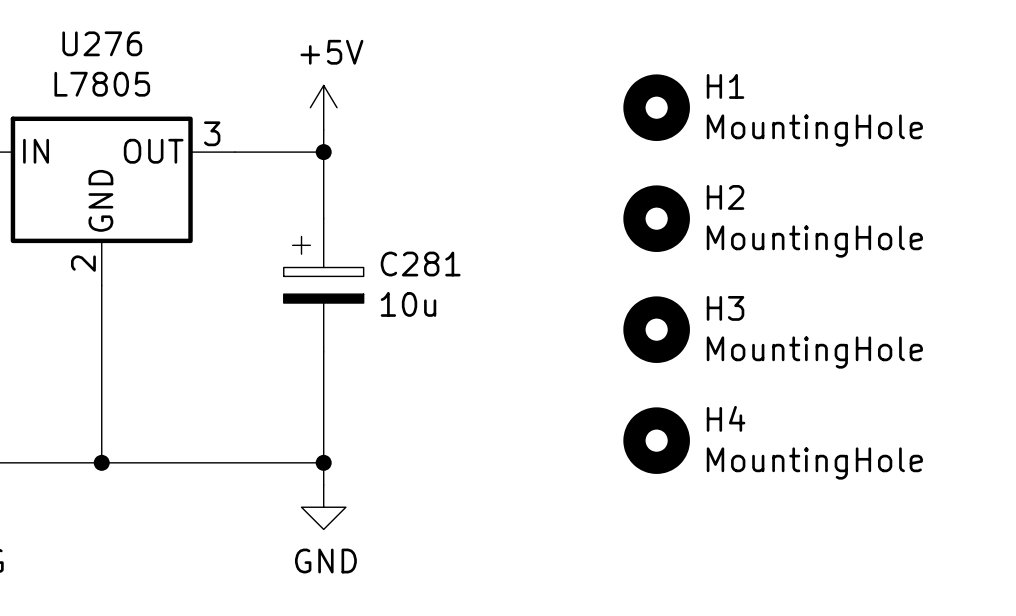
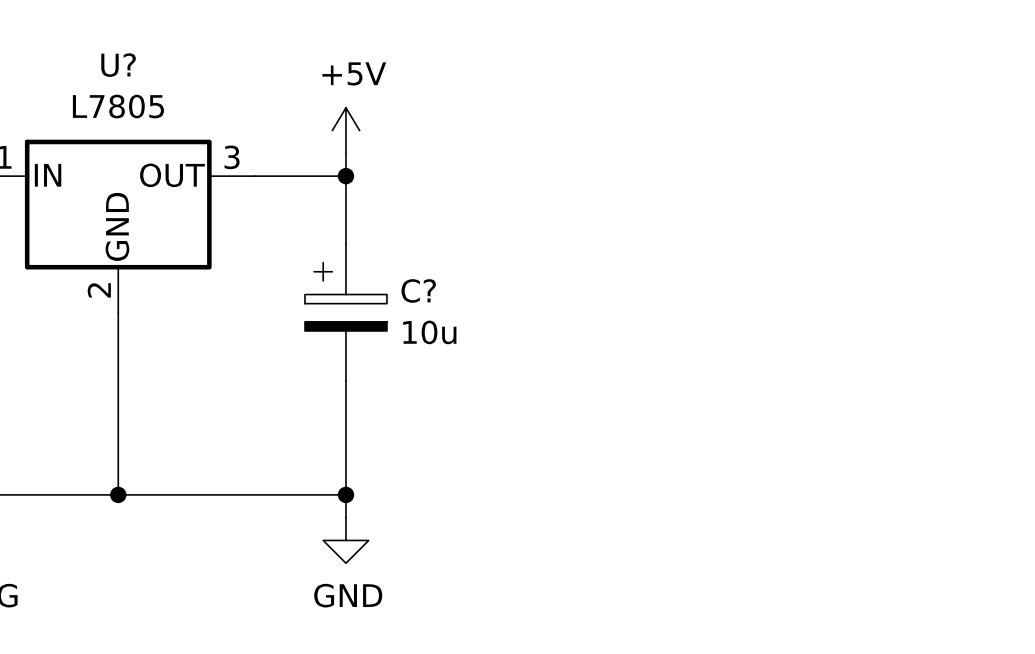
U276 name: U276 (102, 43) -> U? (118, 65)
H1: MountingHole (656, 107) -> none
H2: MountingHole (656, 218) -> none
C281 name: C281 (420, 264) -> C? (418, 290)
H3: MountingHole (656, 329) -> none
H4: MountingHole (656, 440) -> none

